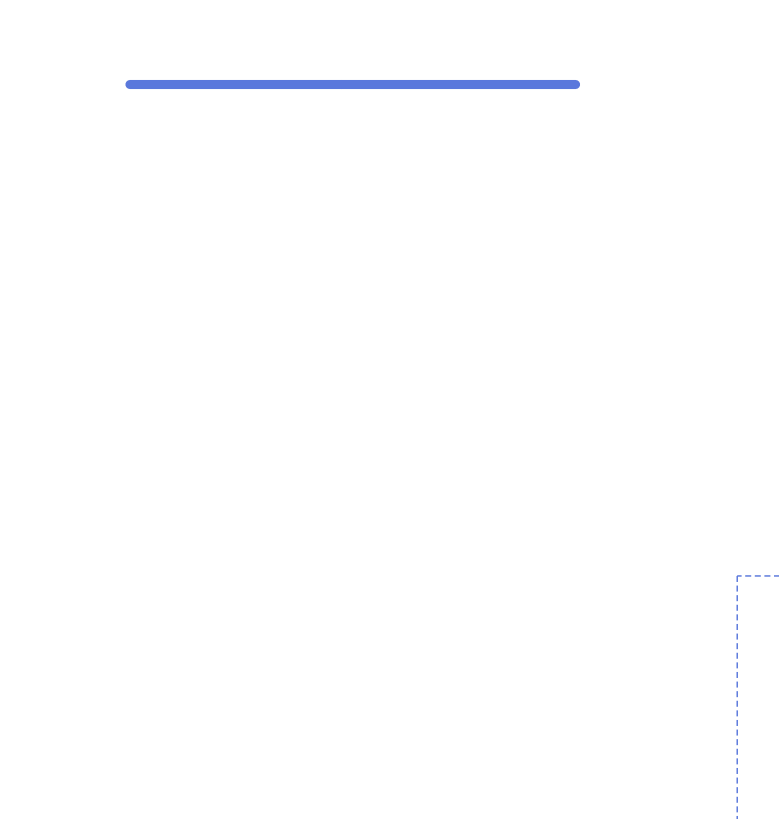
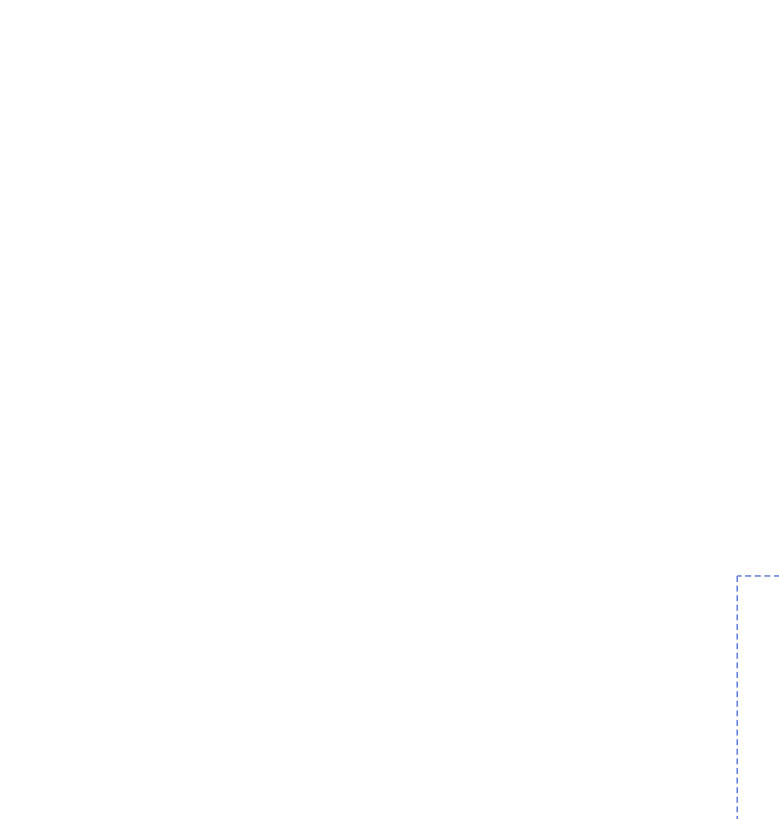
track: (575, 84) (129, 84) -> none

